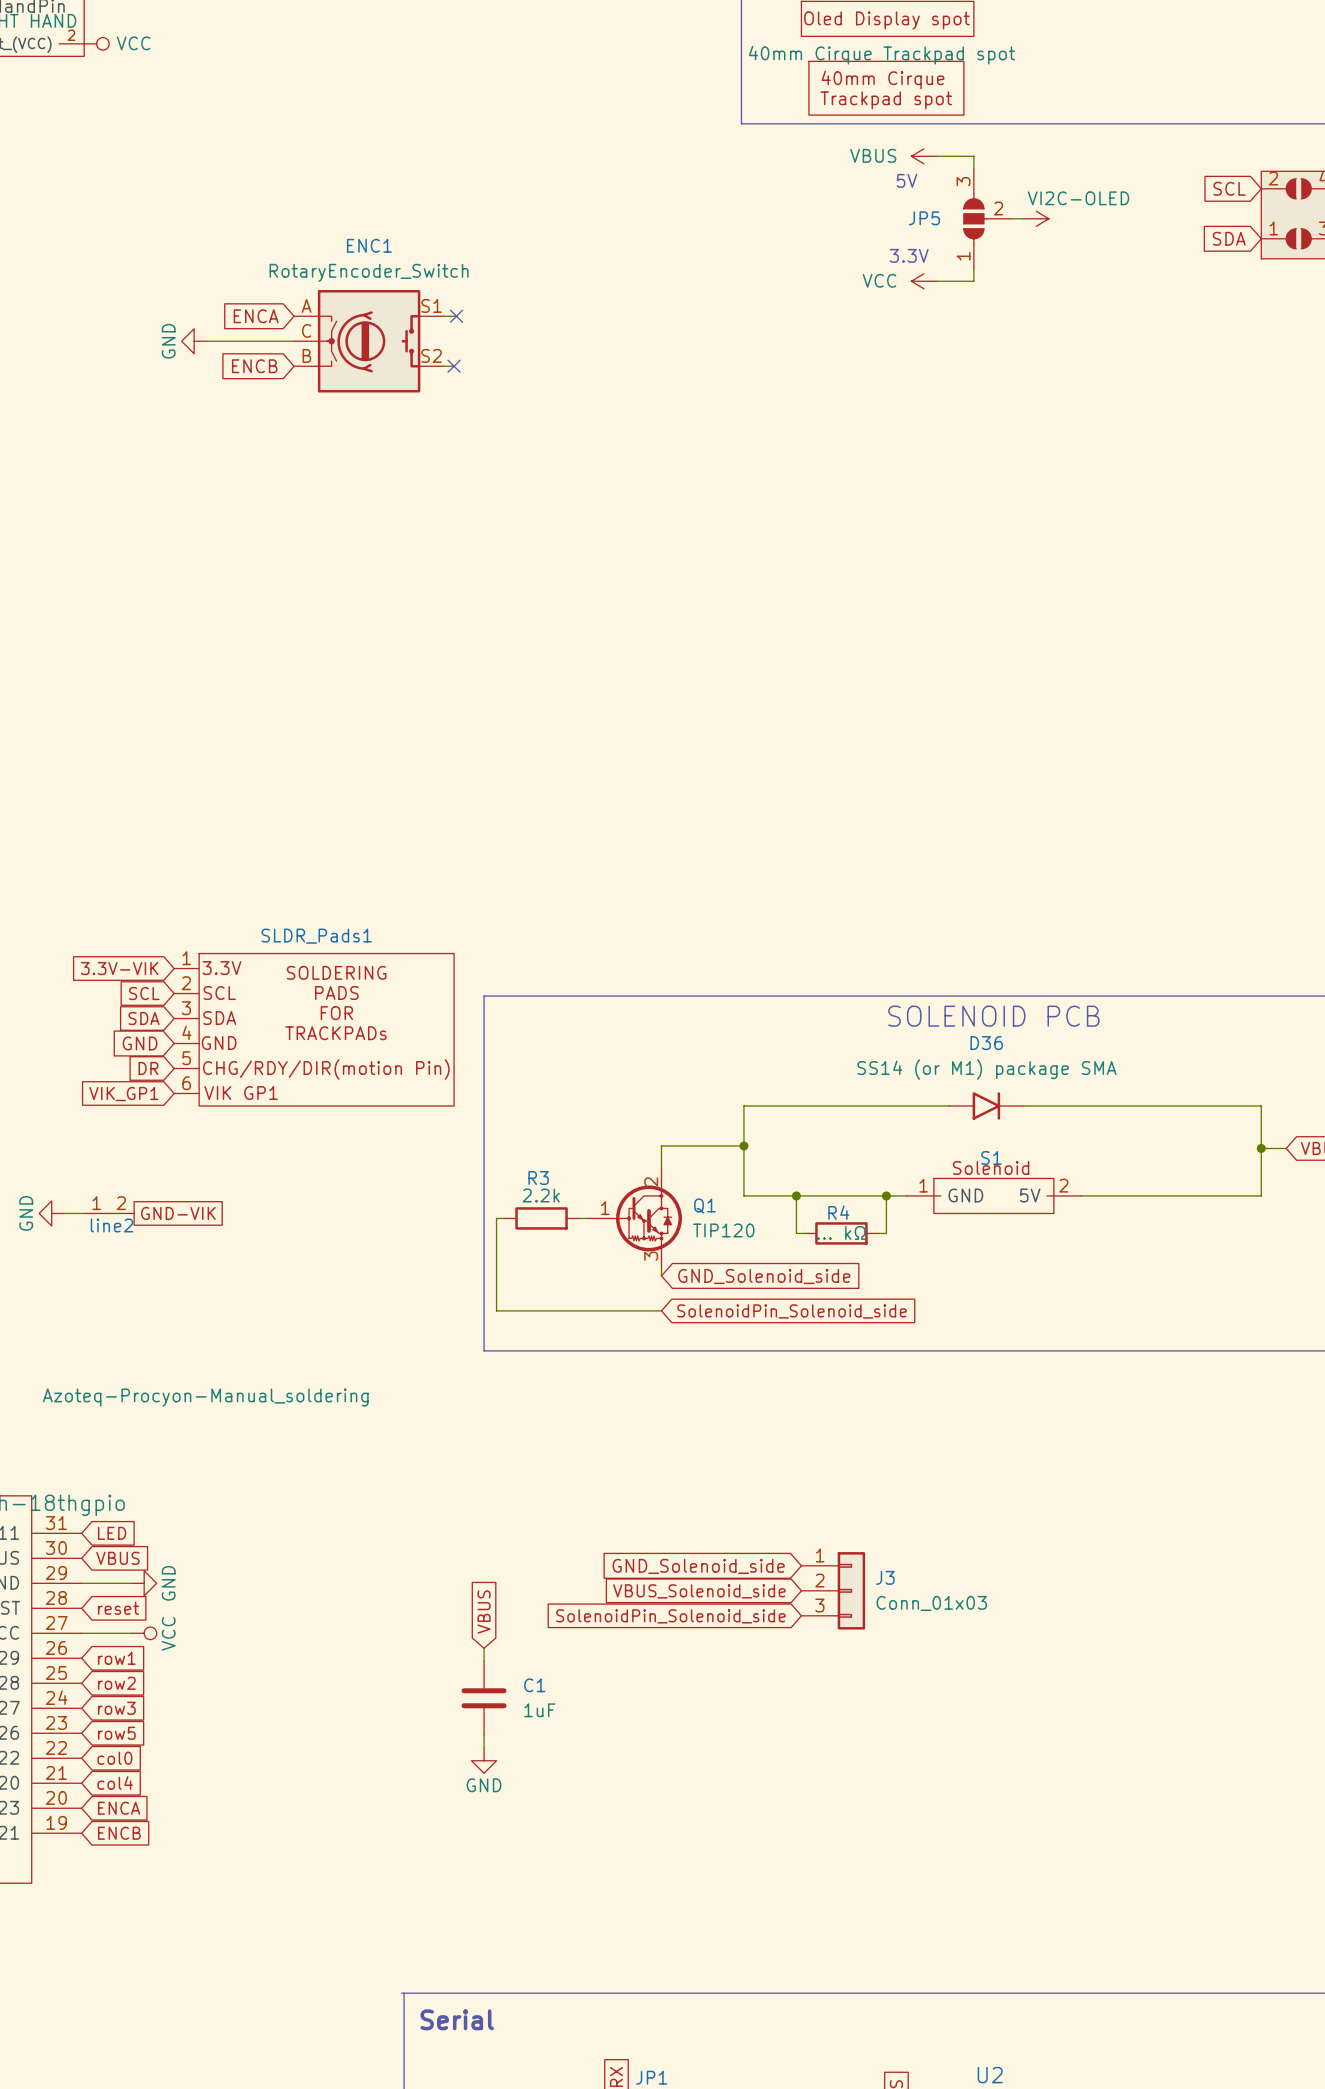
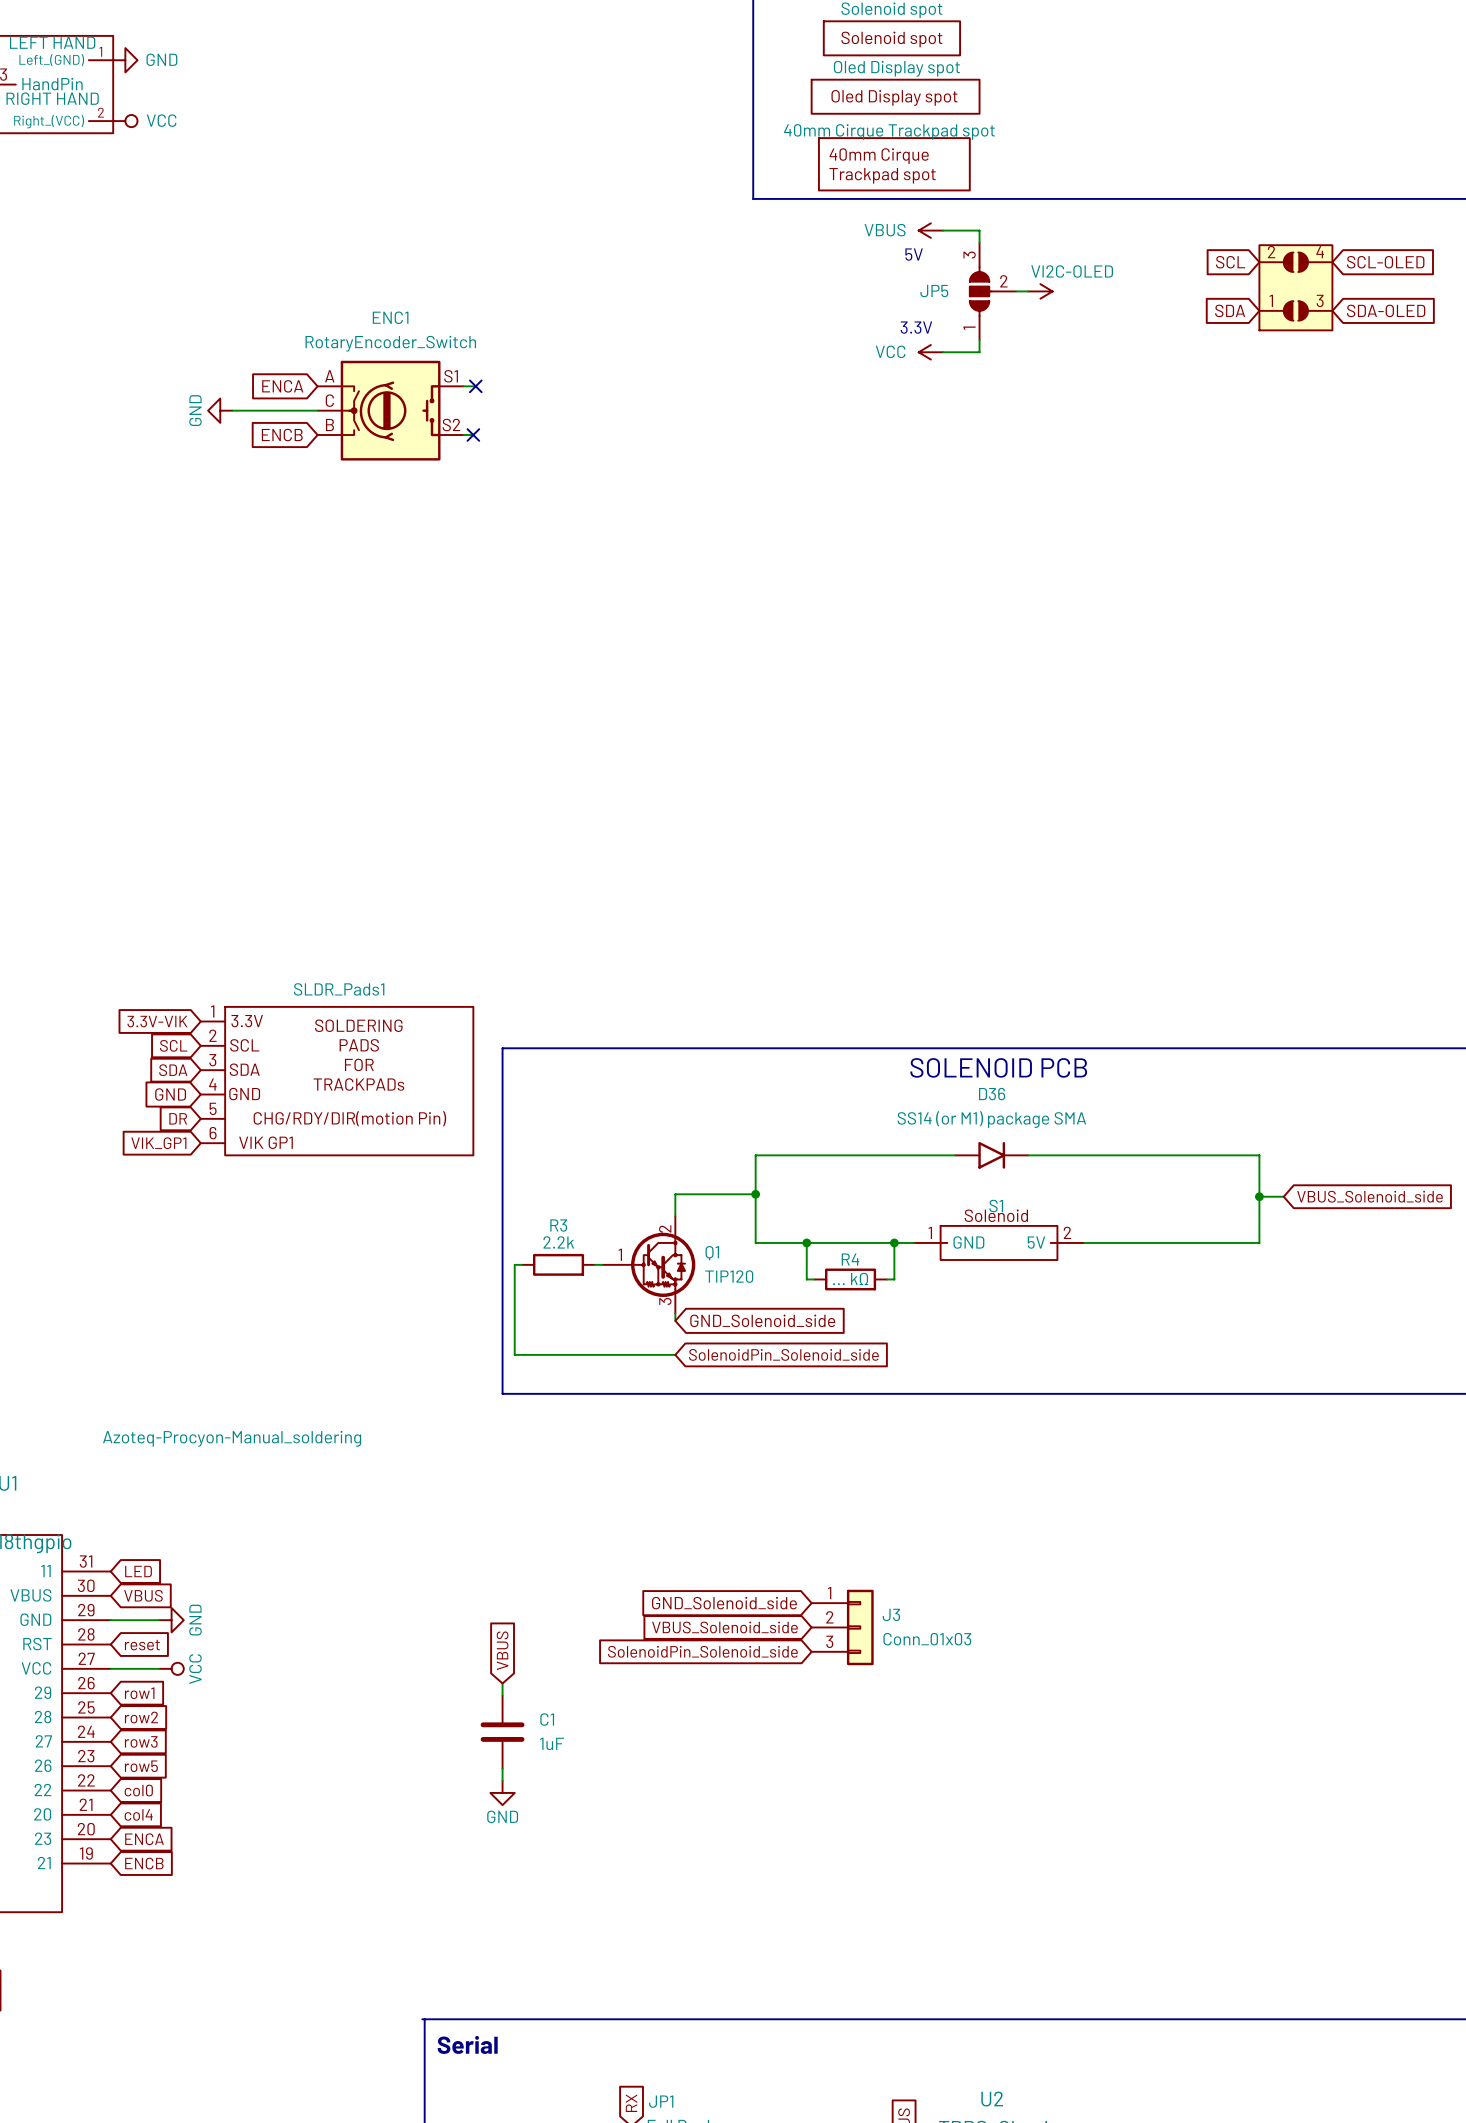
power symbol: GND (51, 1213) -> none
wire: (64, 1213) (84, 1213) -> none
line2: (109, 1213) -> none
global label: GND-VIK (178, 1213) -> none

